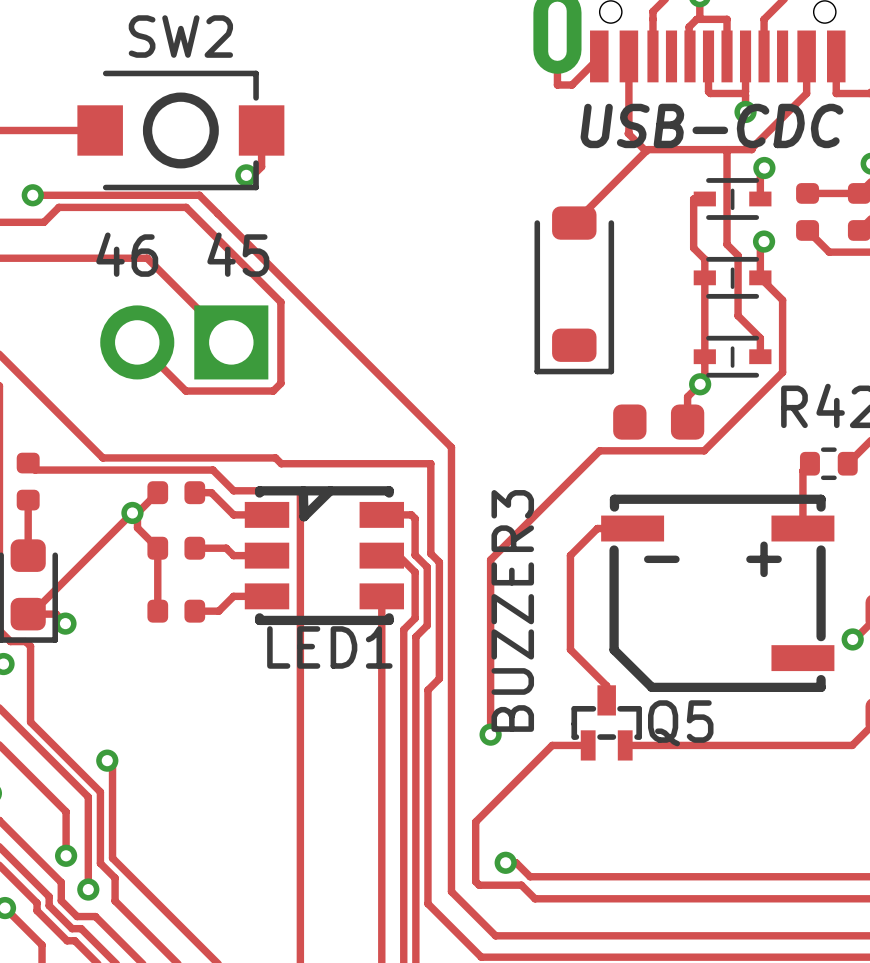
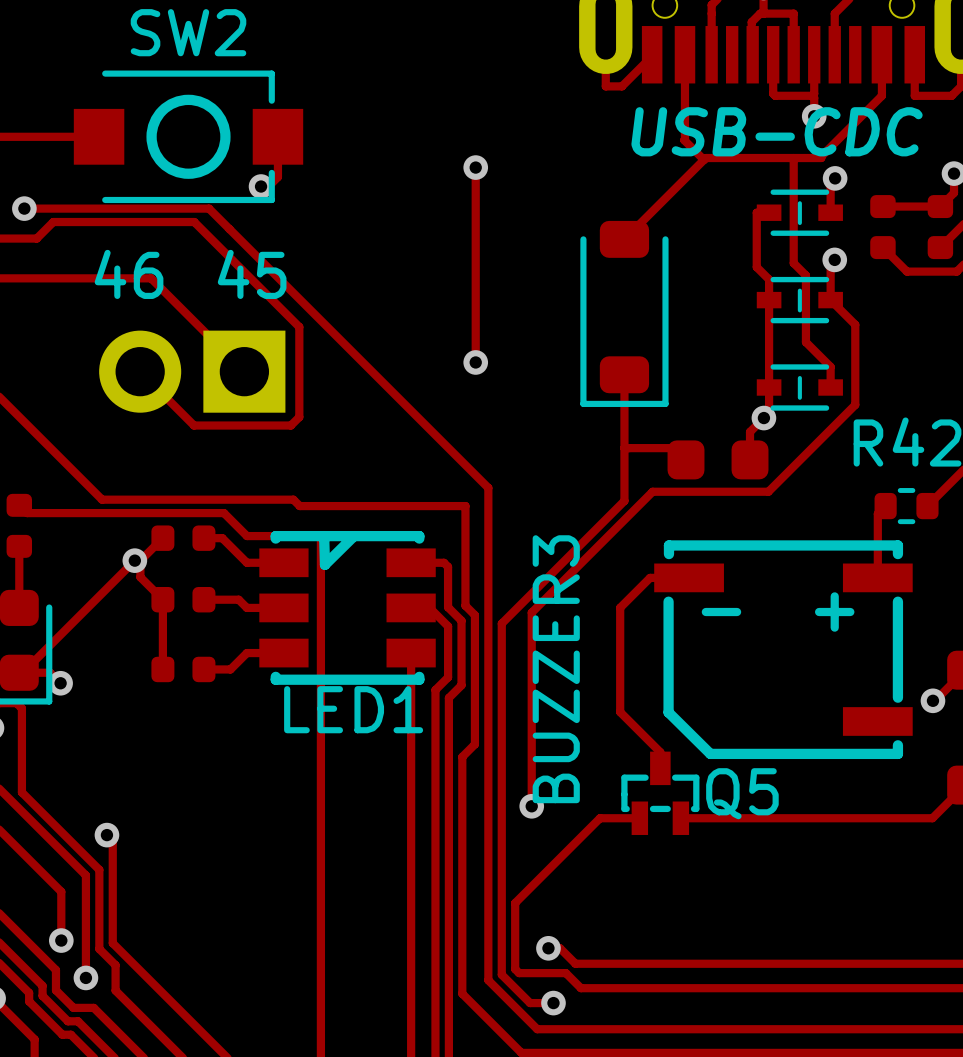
track: none -> (475, 167) (475, 362)
via: none -> (475, 167)
via: none -> (475, 362)
track: none -> (624, 374) (624, 500) (501, 623) (501, 974) (530, 1003) (553, 1003)
track: none -> (624, 448) (674, 448) (686, 459)
via: none -> (553, 1003)

